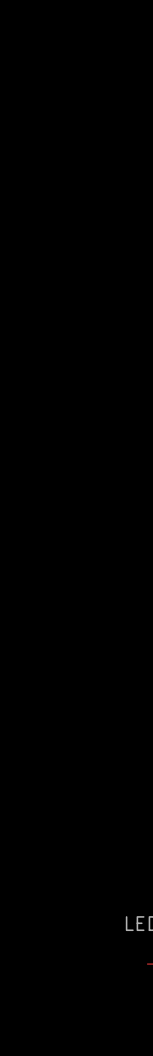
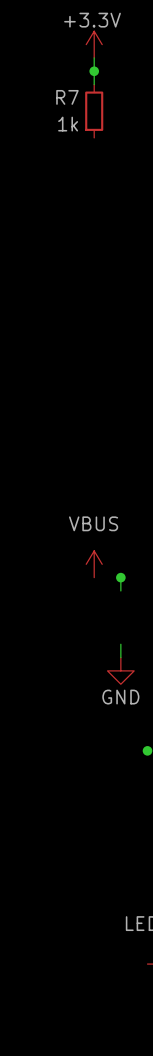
power symbol: none -> +3.3V (94, 44)
wire: none -> (94, 57) (94, 84)
junction: none -> (94, 71)
R7: none -> 1k (94, 111)
power symbol: none -> VBUS (94, 564)
wire: none -> (120, 577) (120, 590)
junction: none -> (120, 577)
wire: none -> (120, 644) (120, 657)
power symbol: none -> GND (120, 670)
junction: none -> (147, 750)

